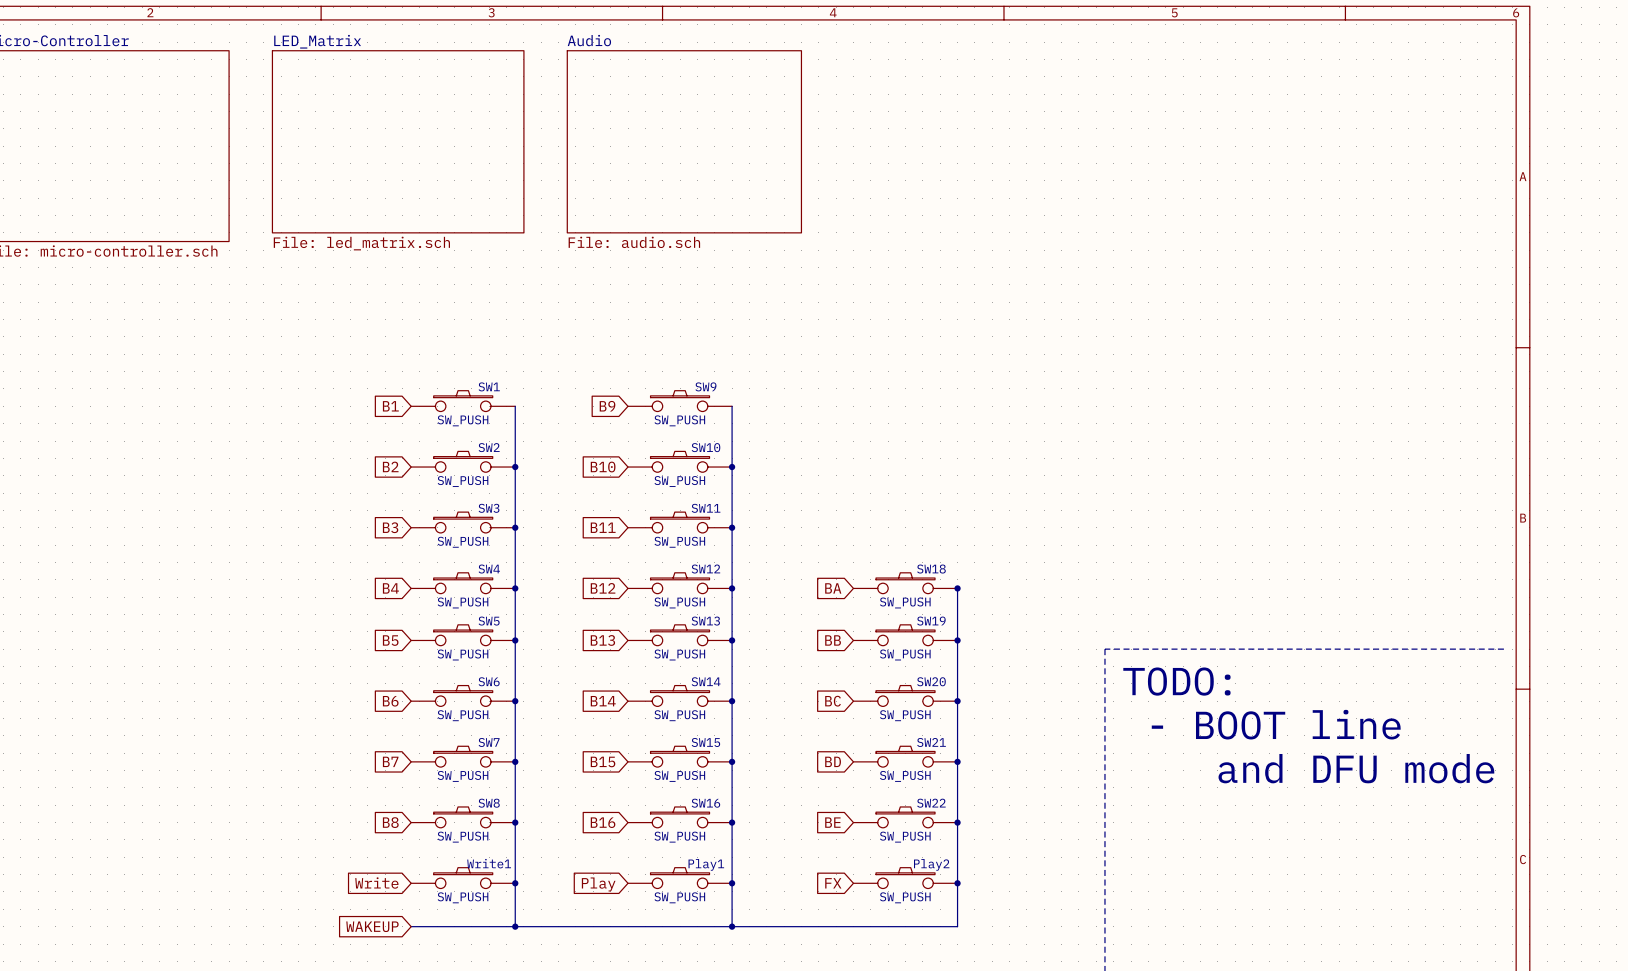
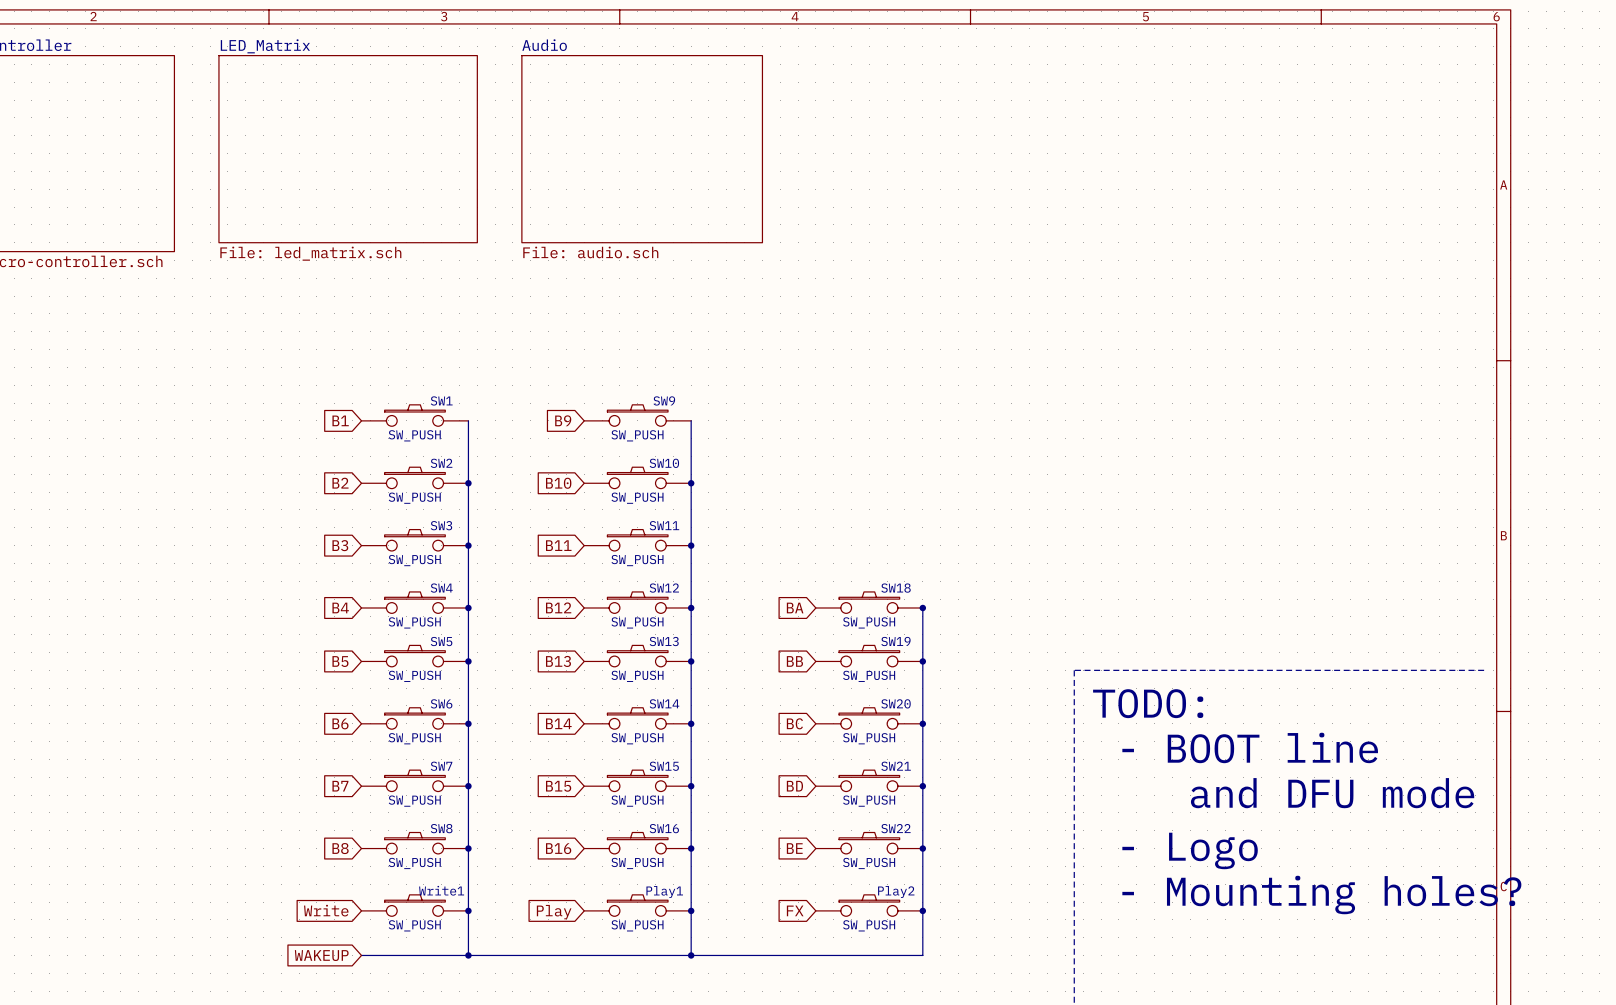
text: none -> - Logo (1190, 850)
text: none -> - Mounting holes? (1321, 894)

